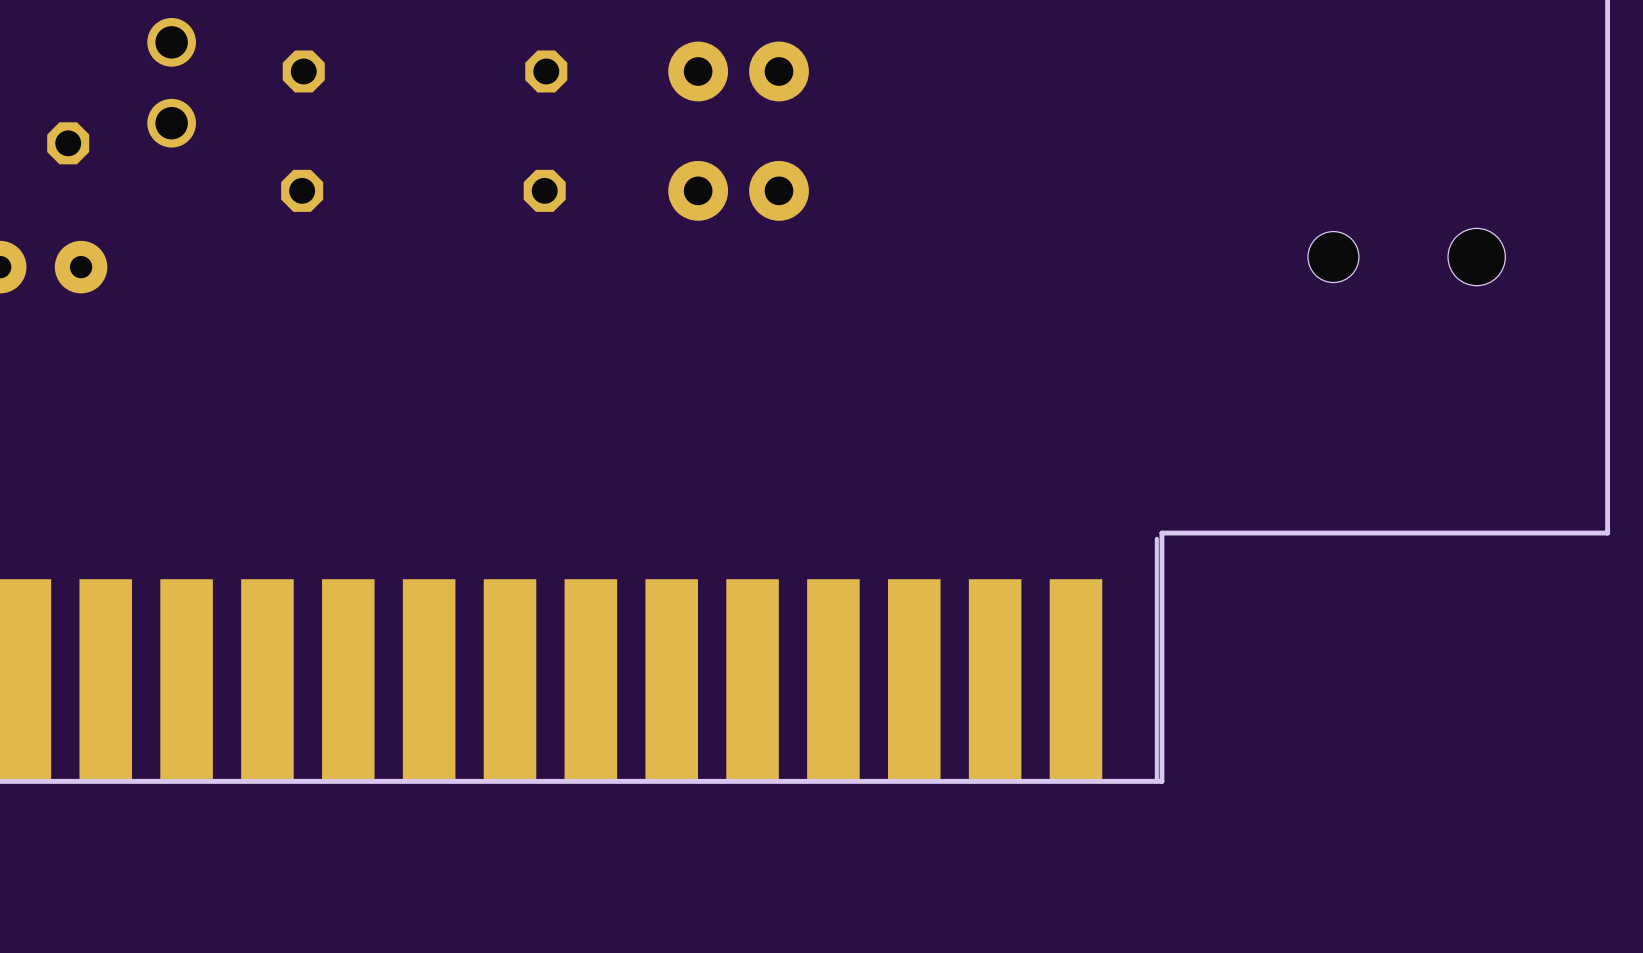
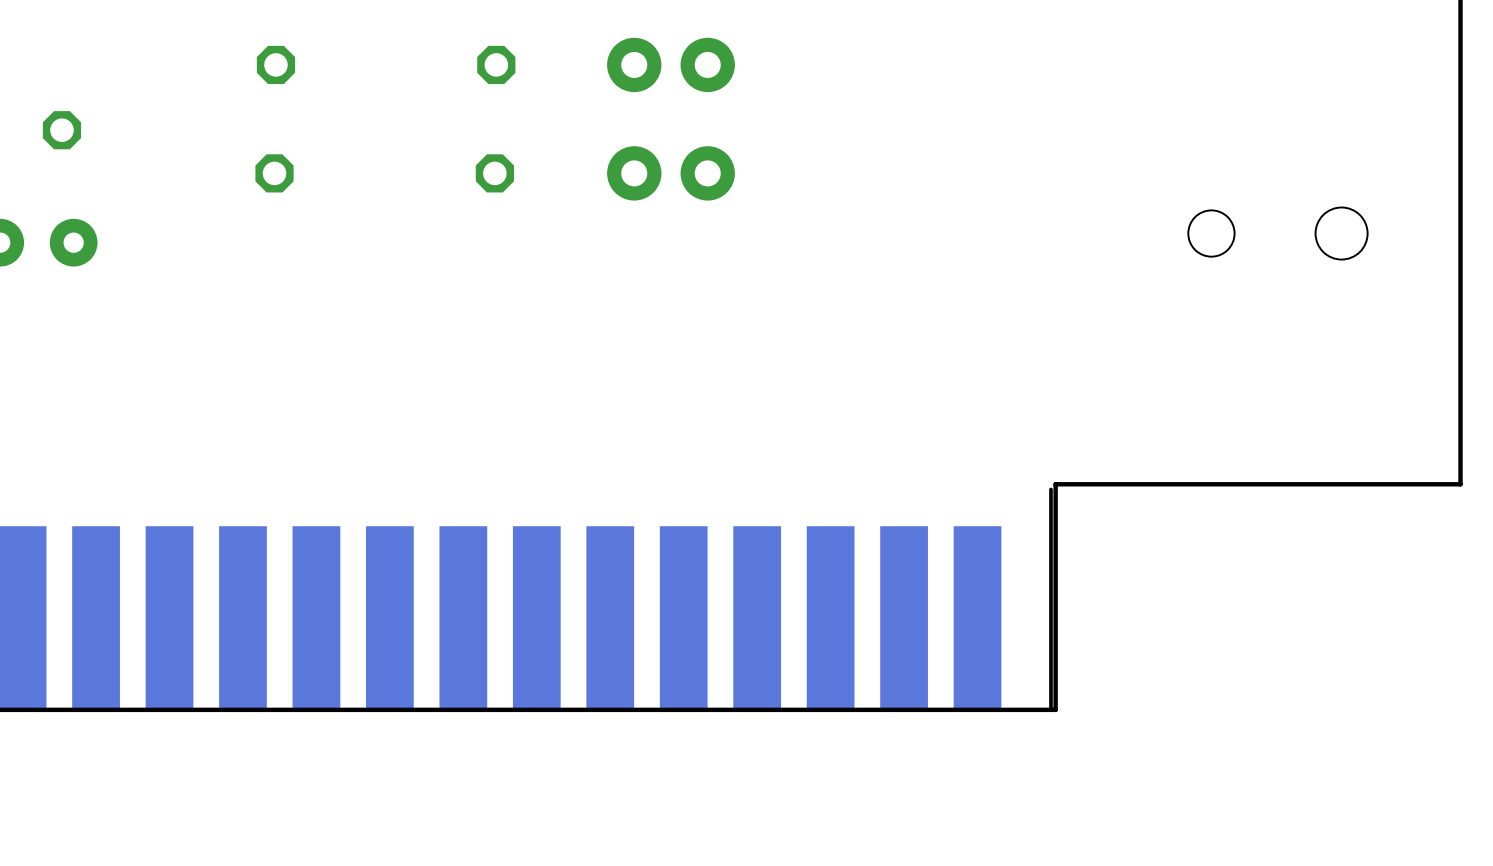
part: (171, 82) -> none

